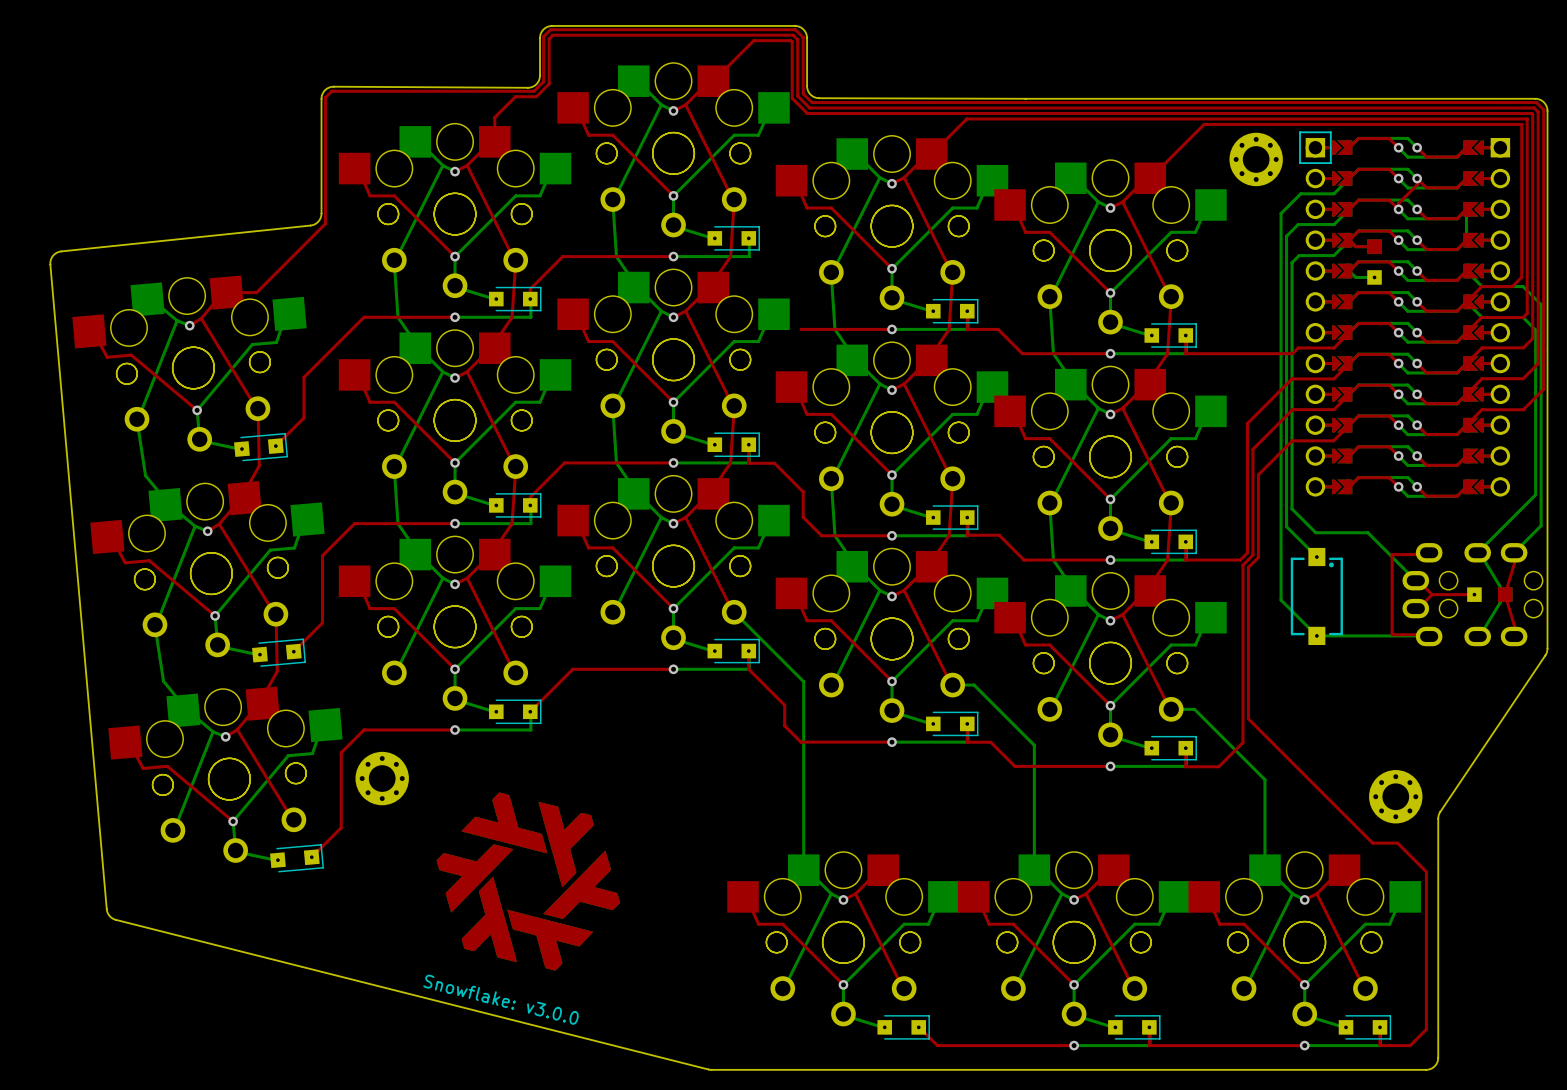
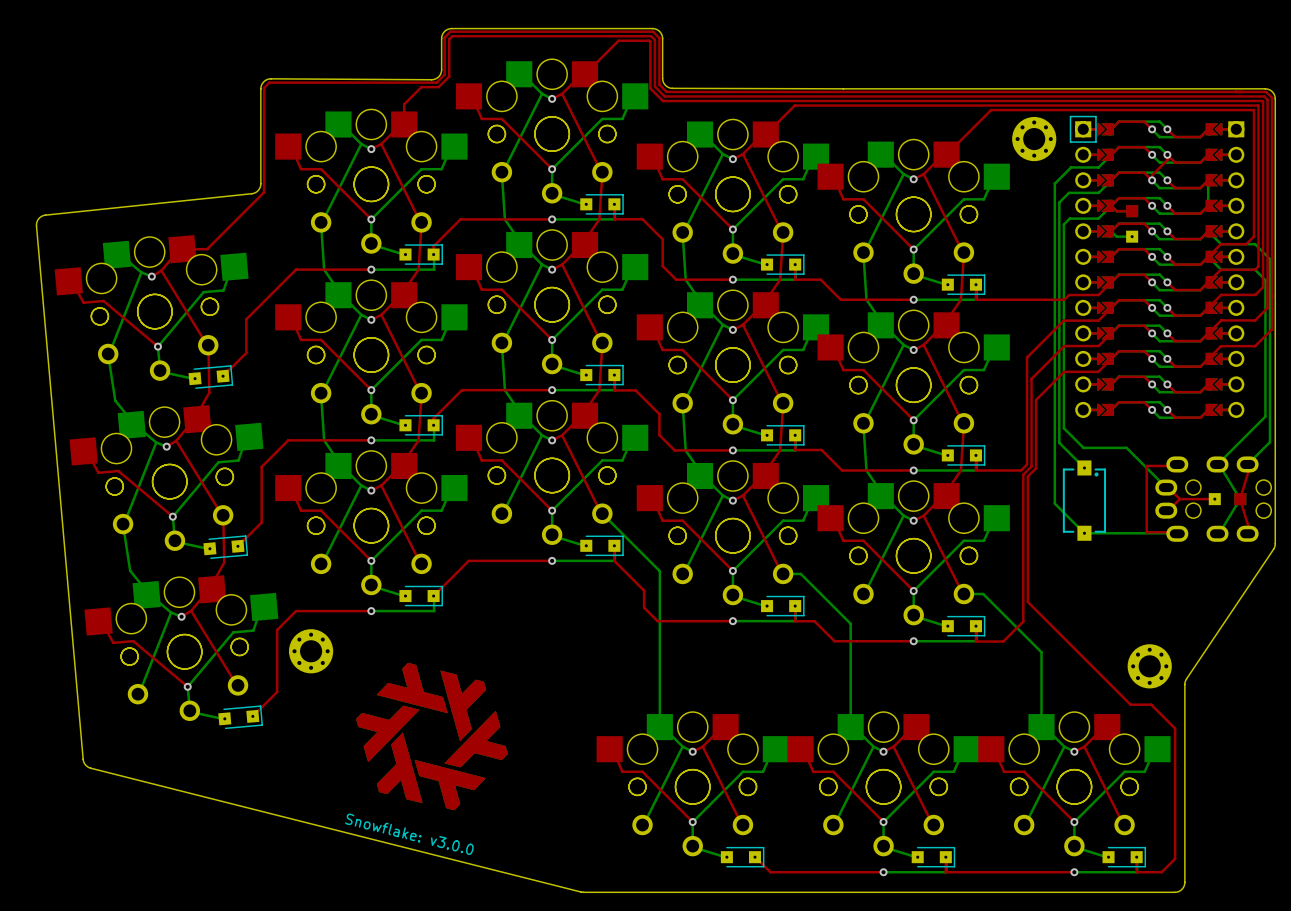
top track: (800, 329) (823, 329) -> (614, 204) (614, 219) (642, 219) (662, 239) (662, 266) (676, 279)

